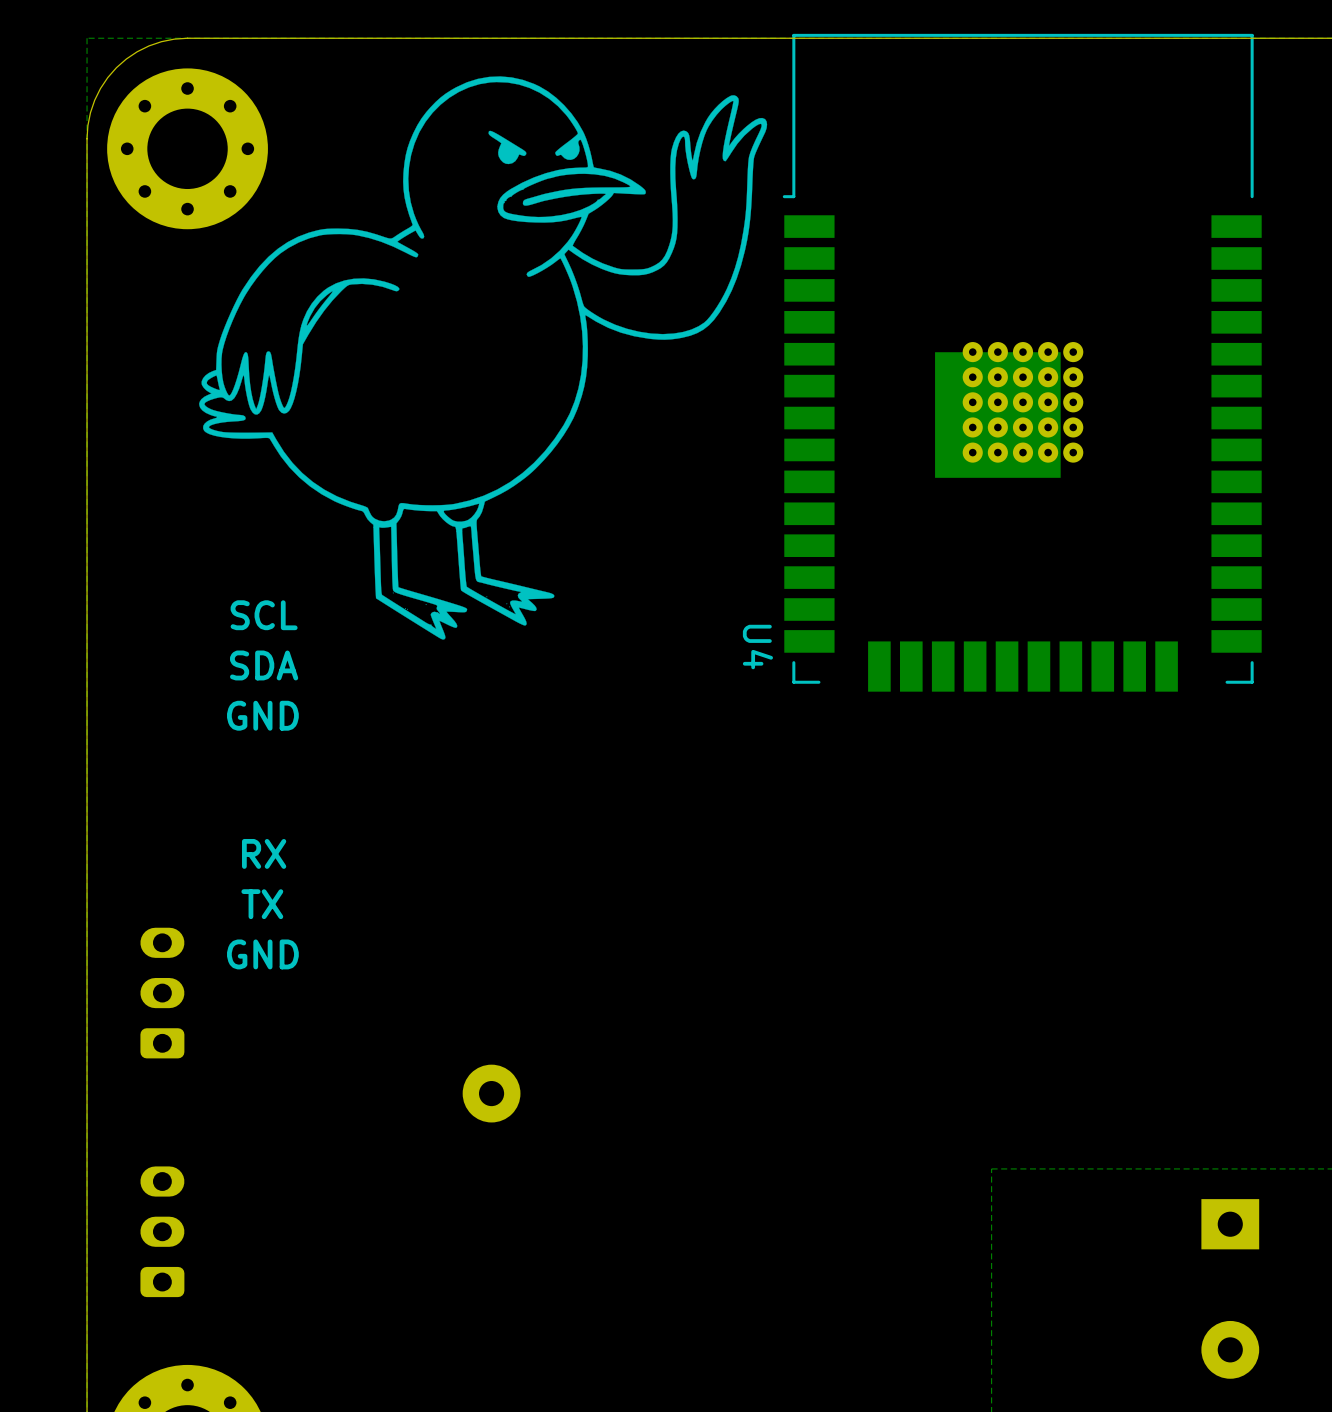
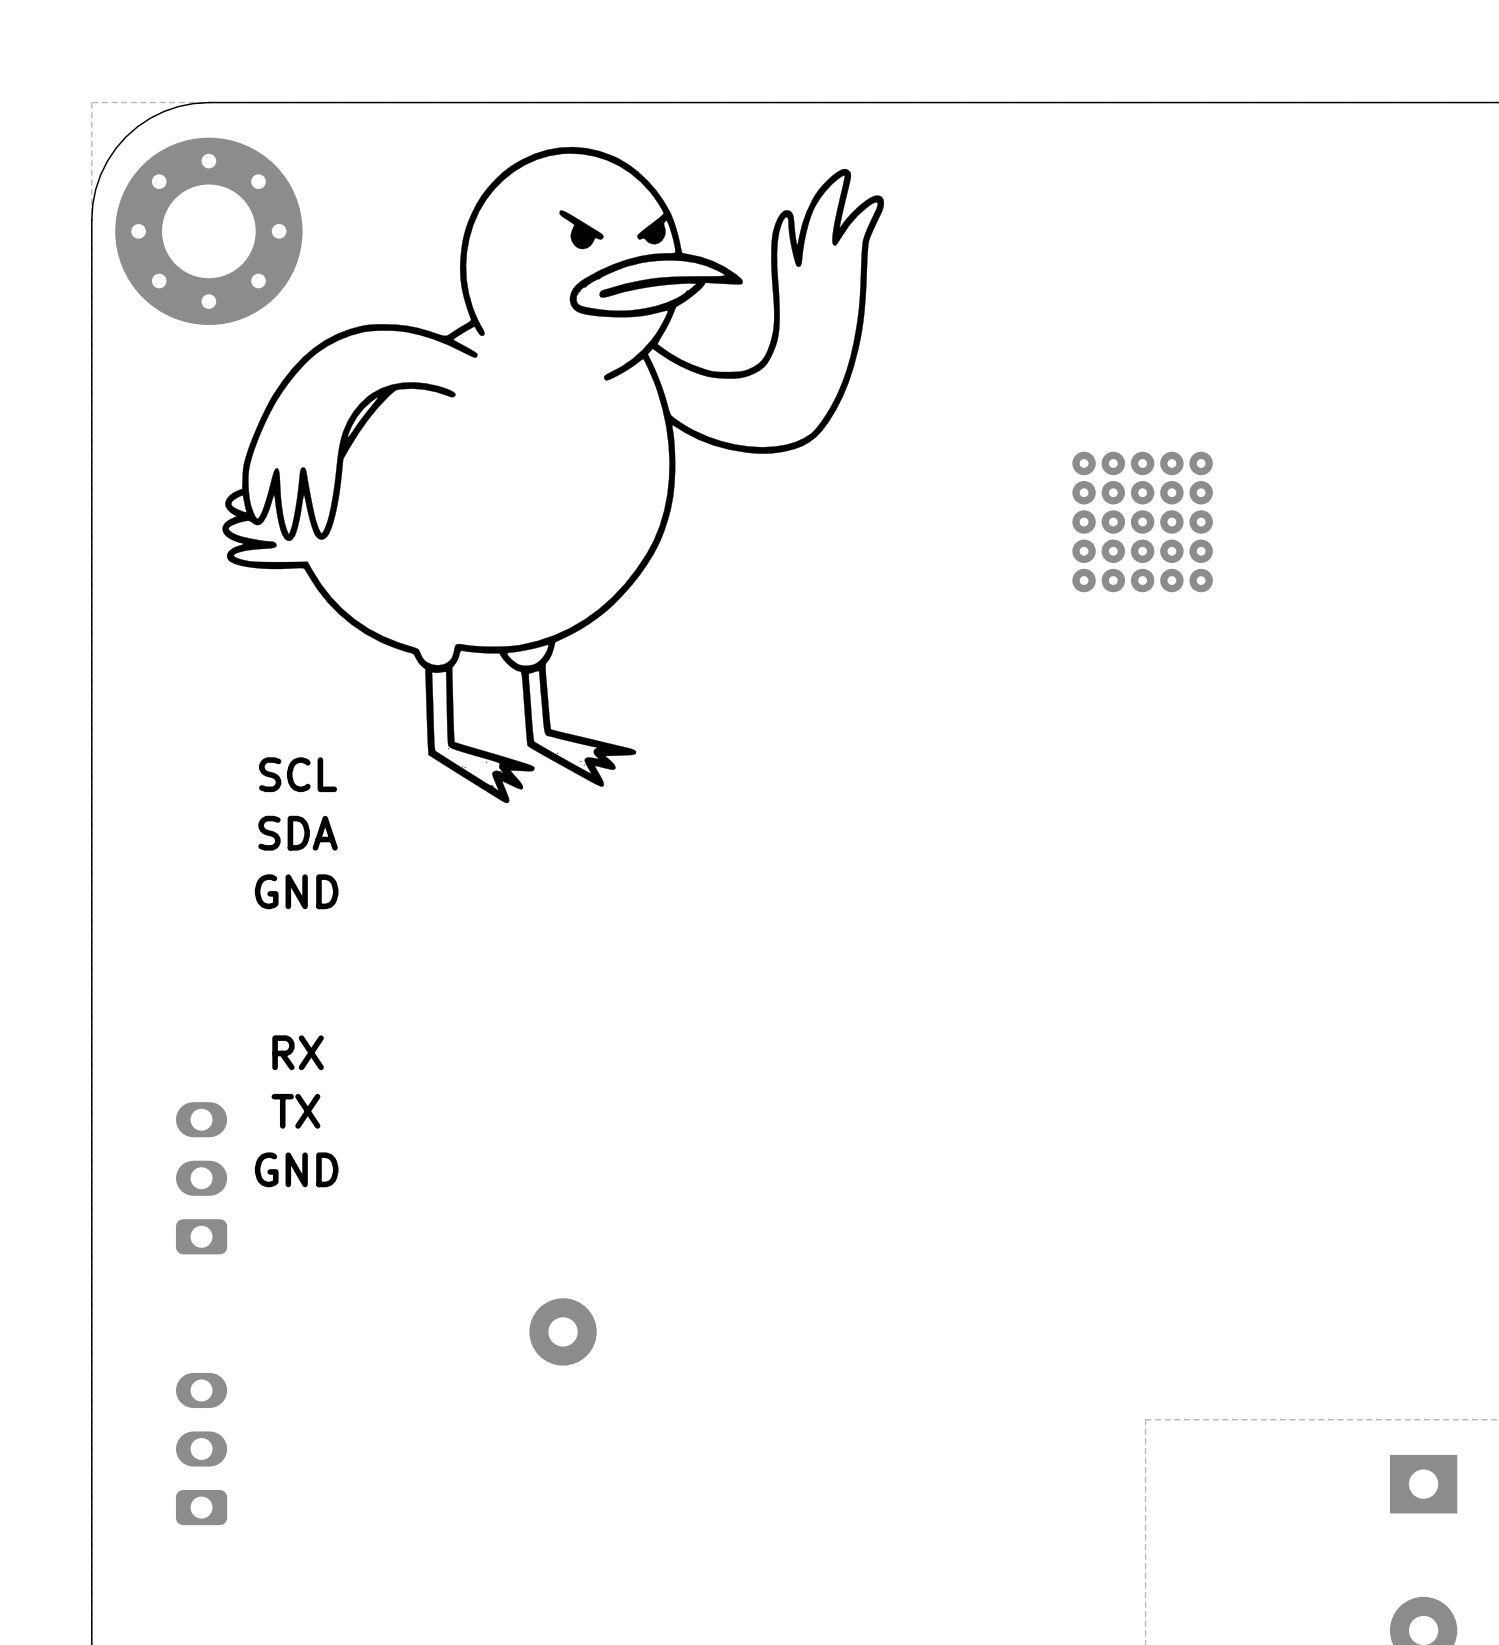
U4: (1022, 362) -> none
part position: (1022, 402) -> (1142, 522)
part position: (162, 993) -> (201, 1178)
part position: (162, 1231) -> (201, 1449)

